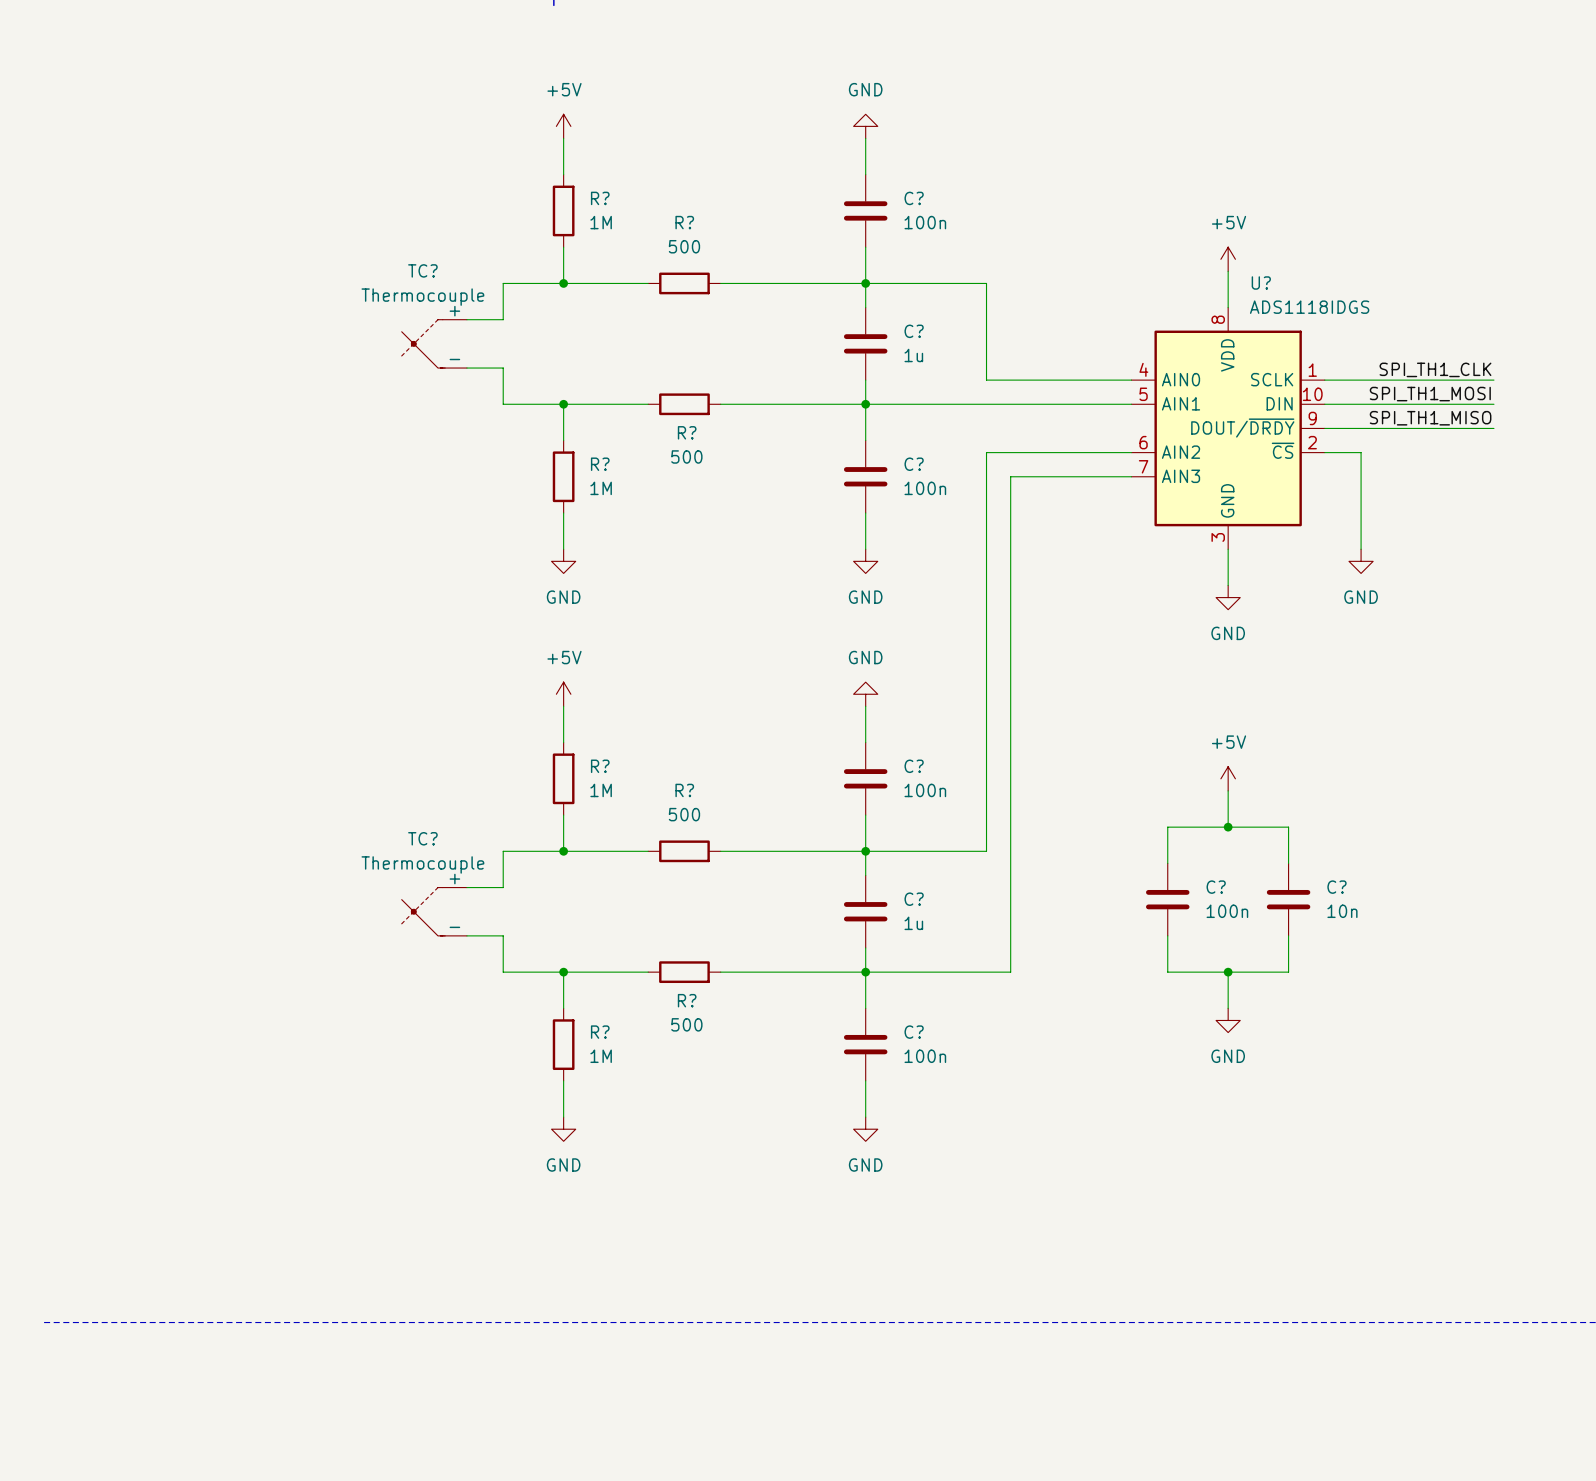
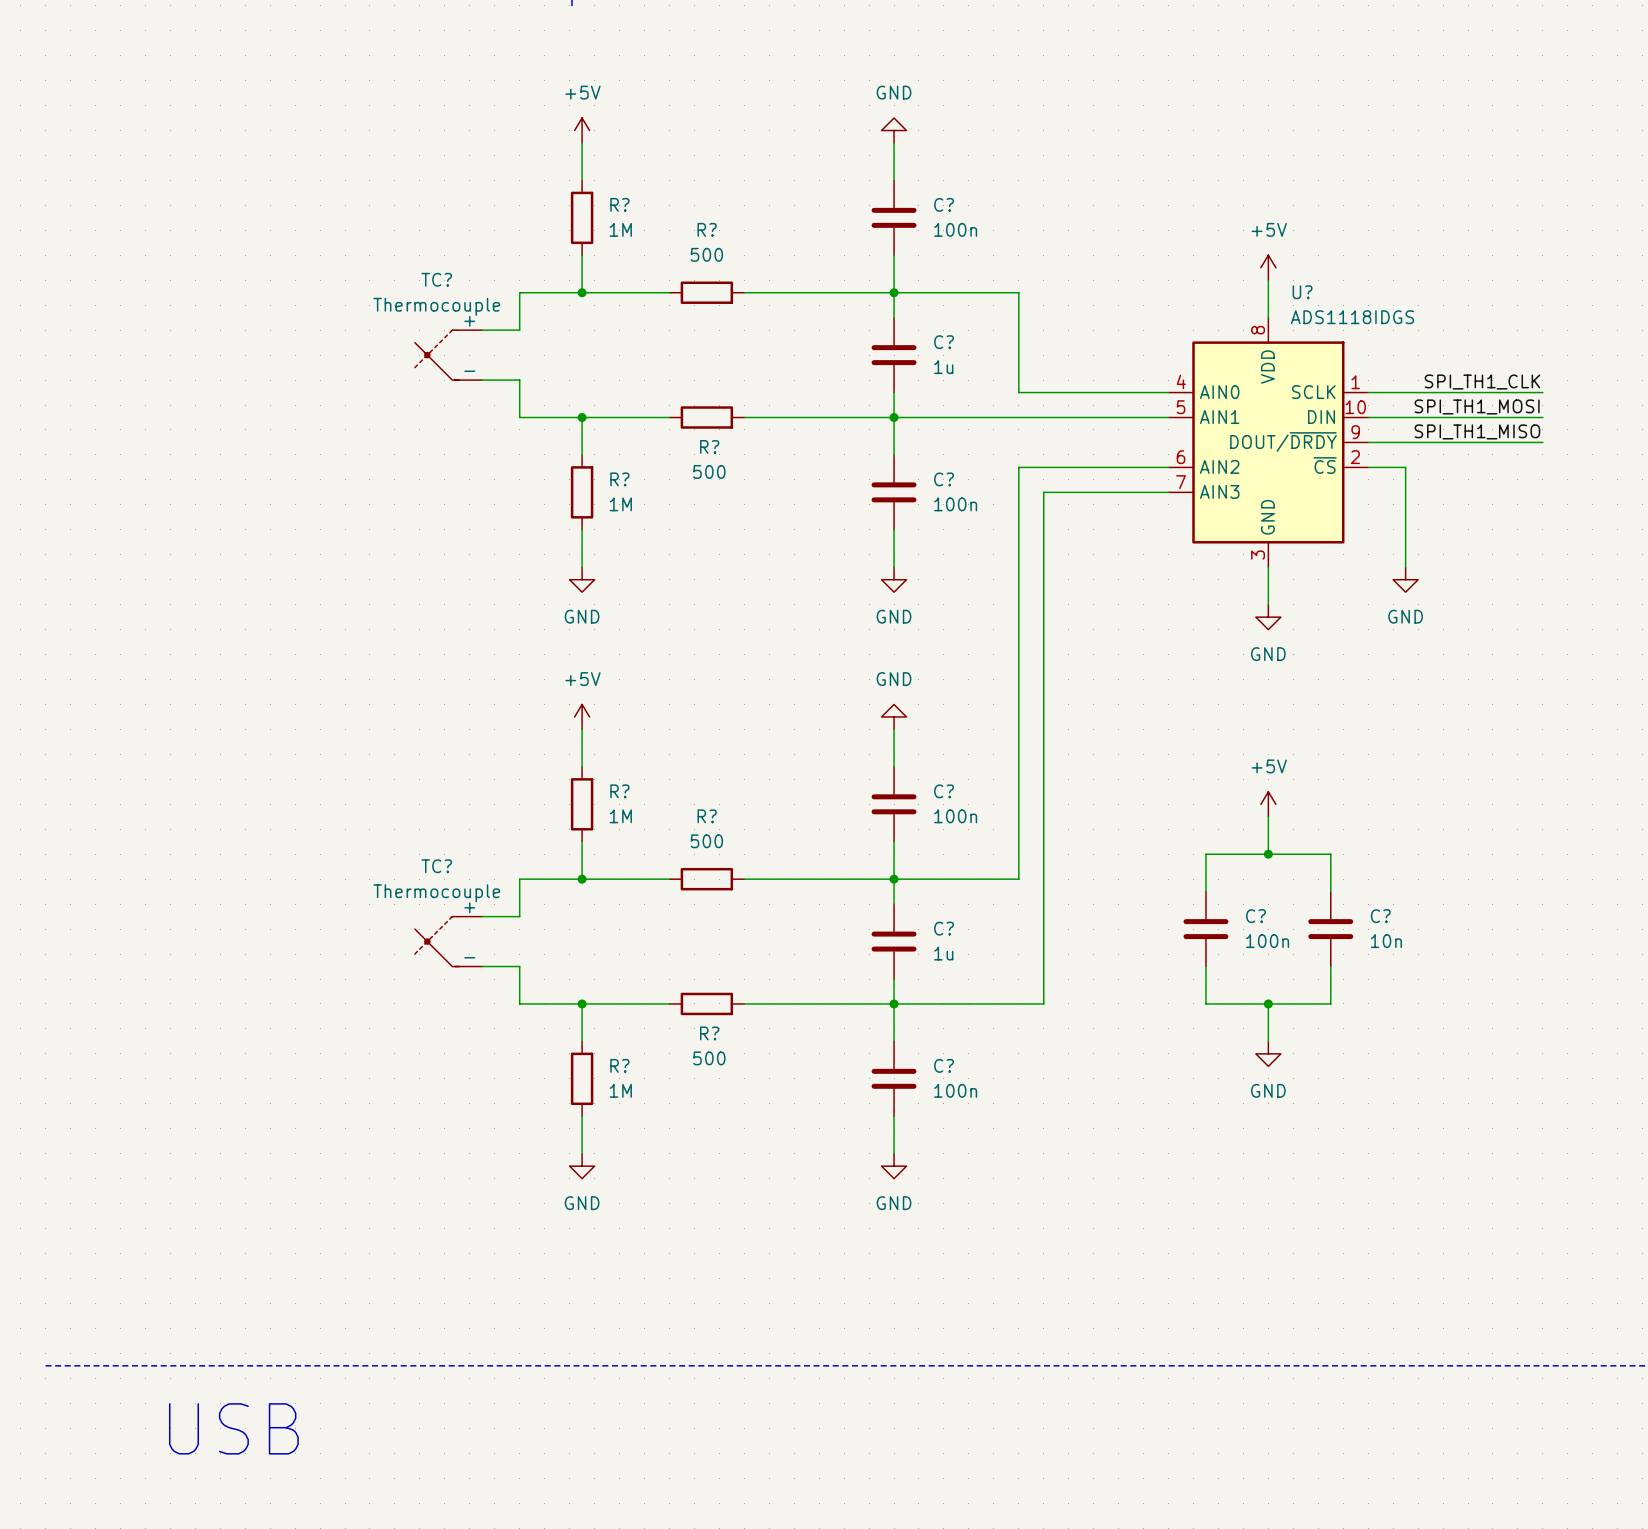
text: none -> USB (233, 1428)

